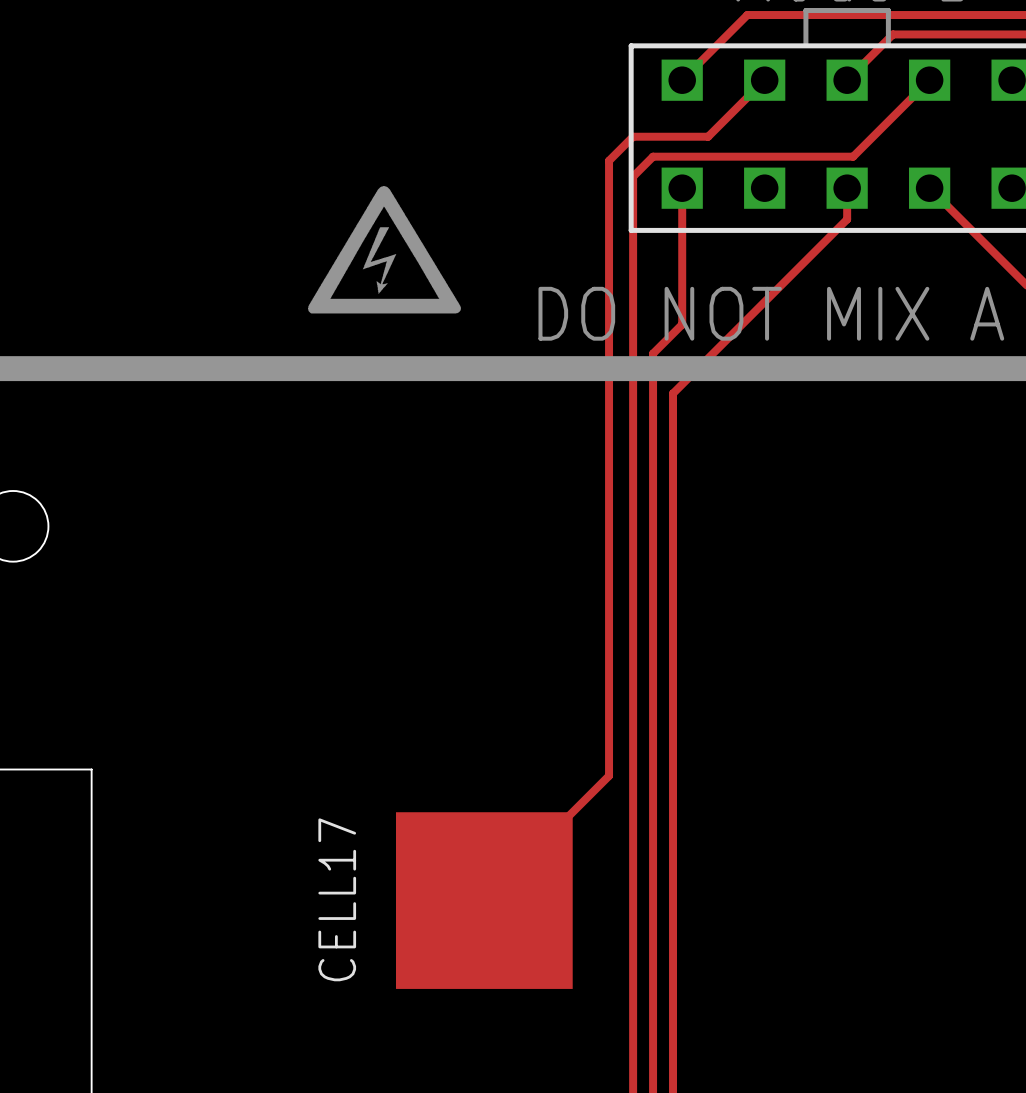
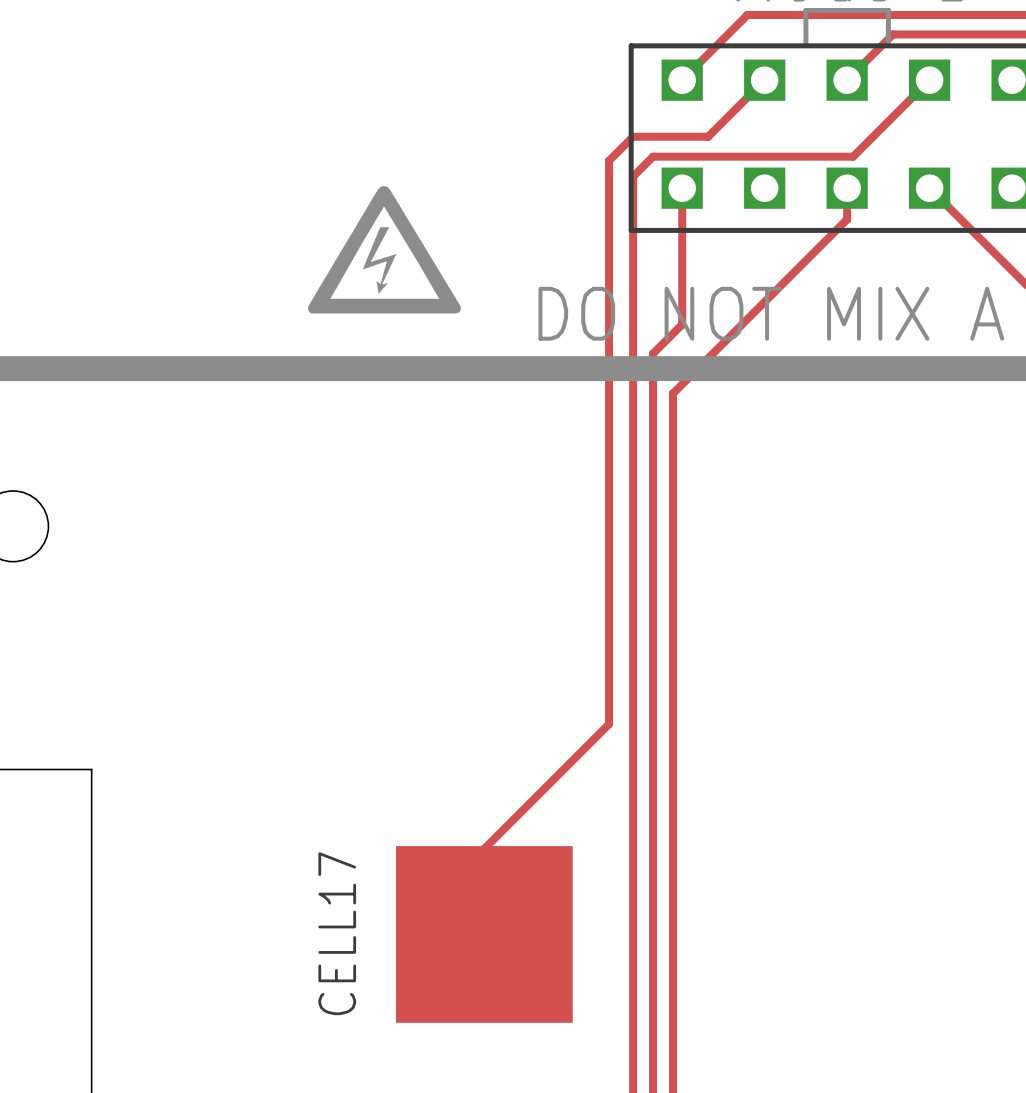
track: (609, 724) (609, 775) (484, 900) -> (609, 724) (484, 848) (484, 934)
CELL17 position: (484, 900) -> (484, 934)

